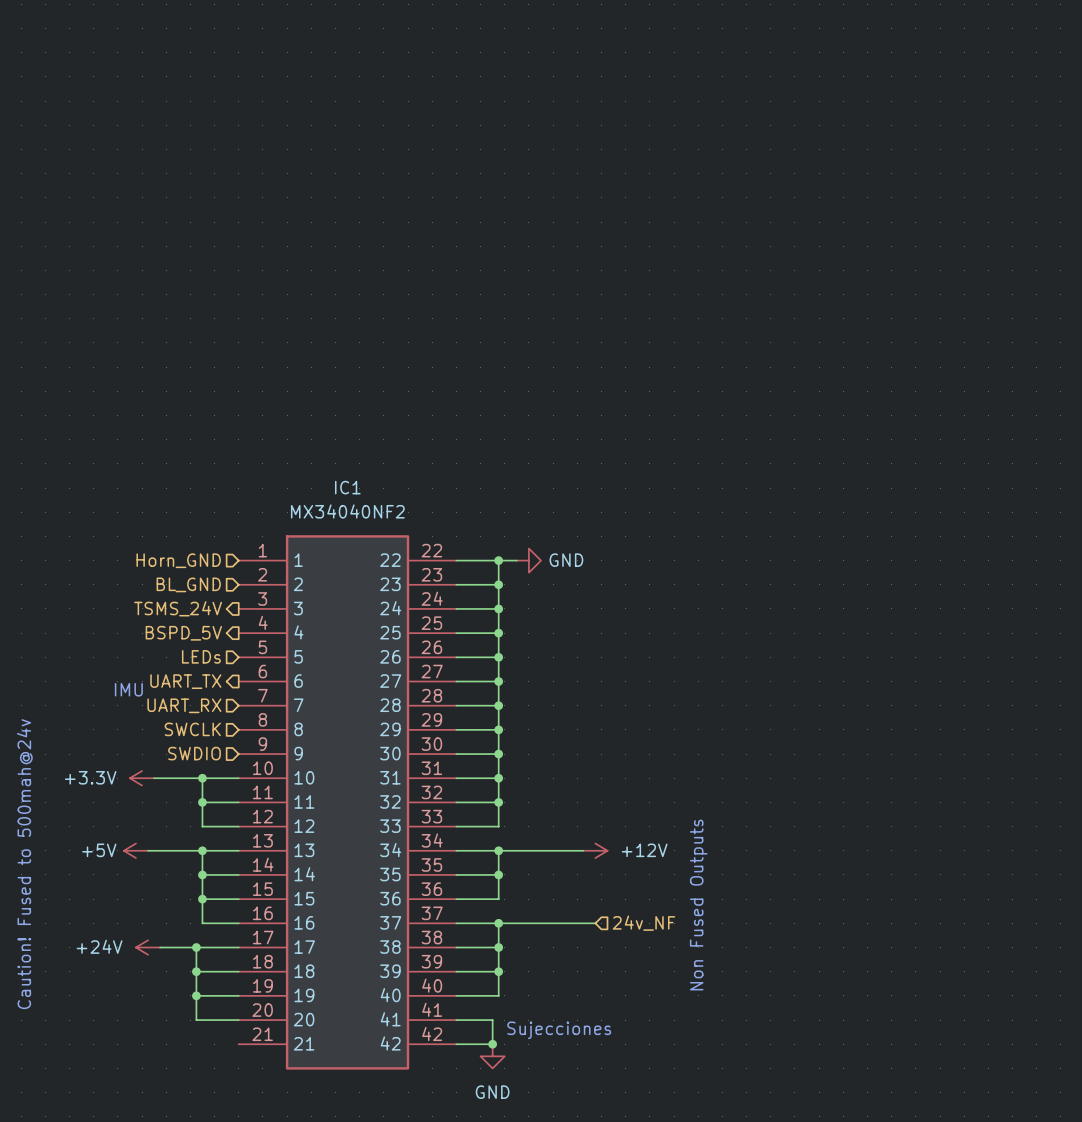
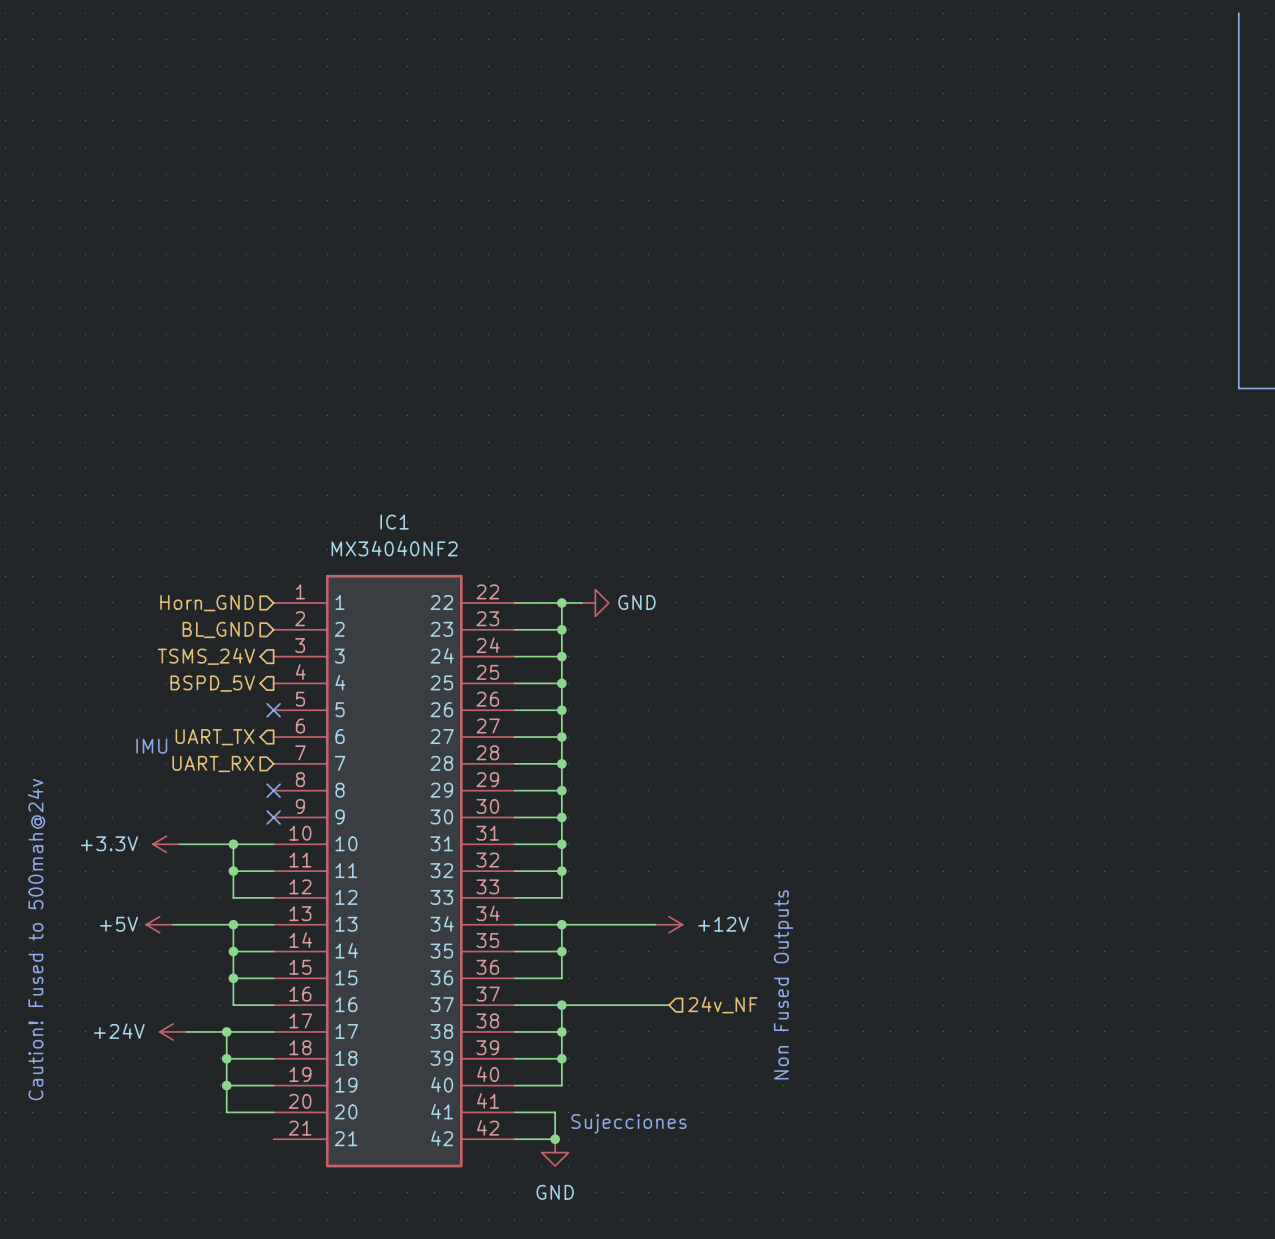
hierarchical label: LEDs (201, 656) -> none
no-connect mark: none -> (273, 710)
hierarchical label: SWCLK (192, 729) -> none
no-connect mark: none -> (273, 790)
hierarchical label: SWDIO (194, 753) -> none
no-connect mark: none -> (273, 817)

